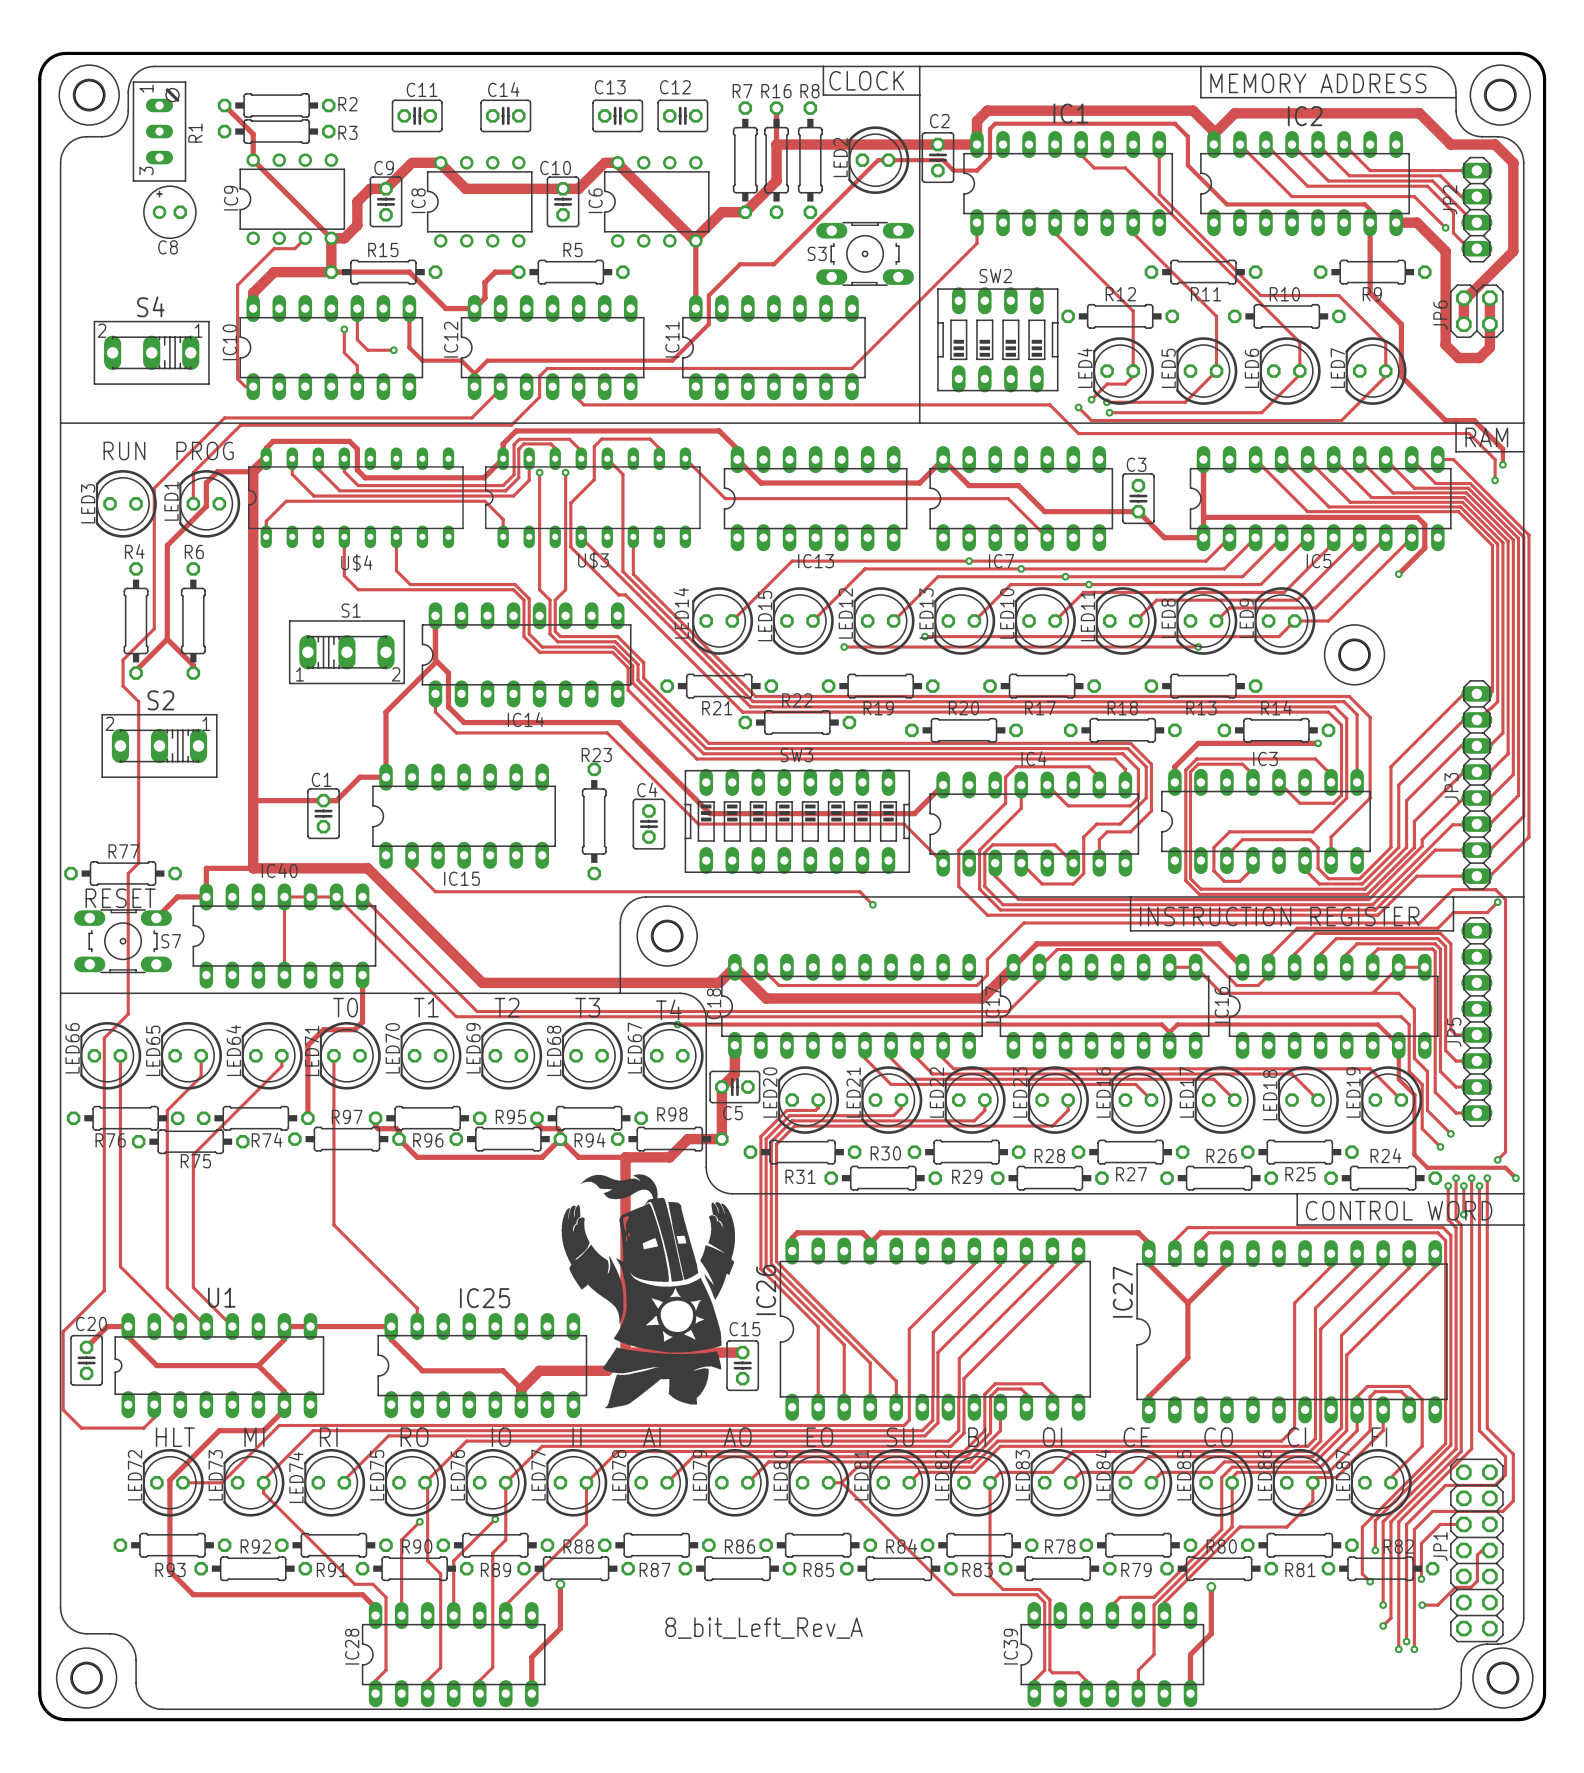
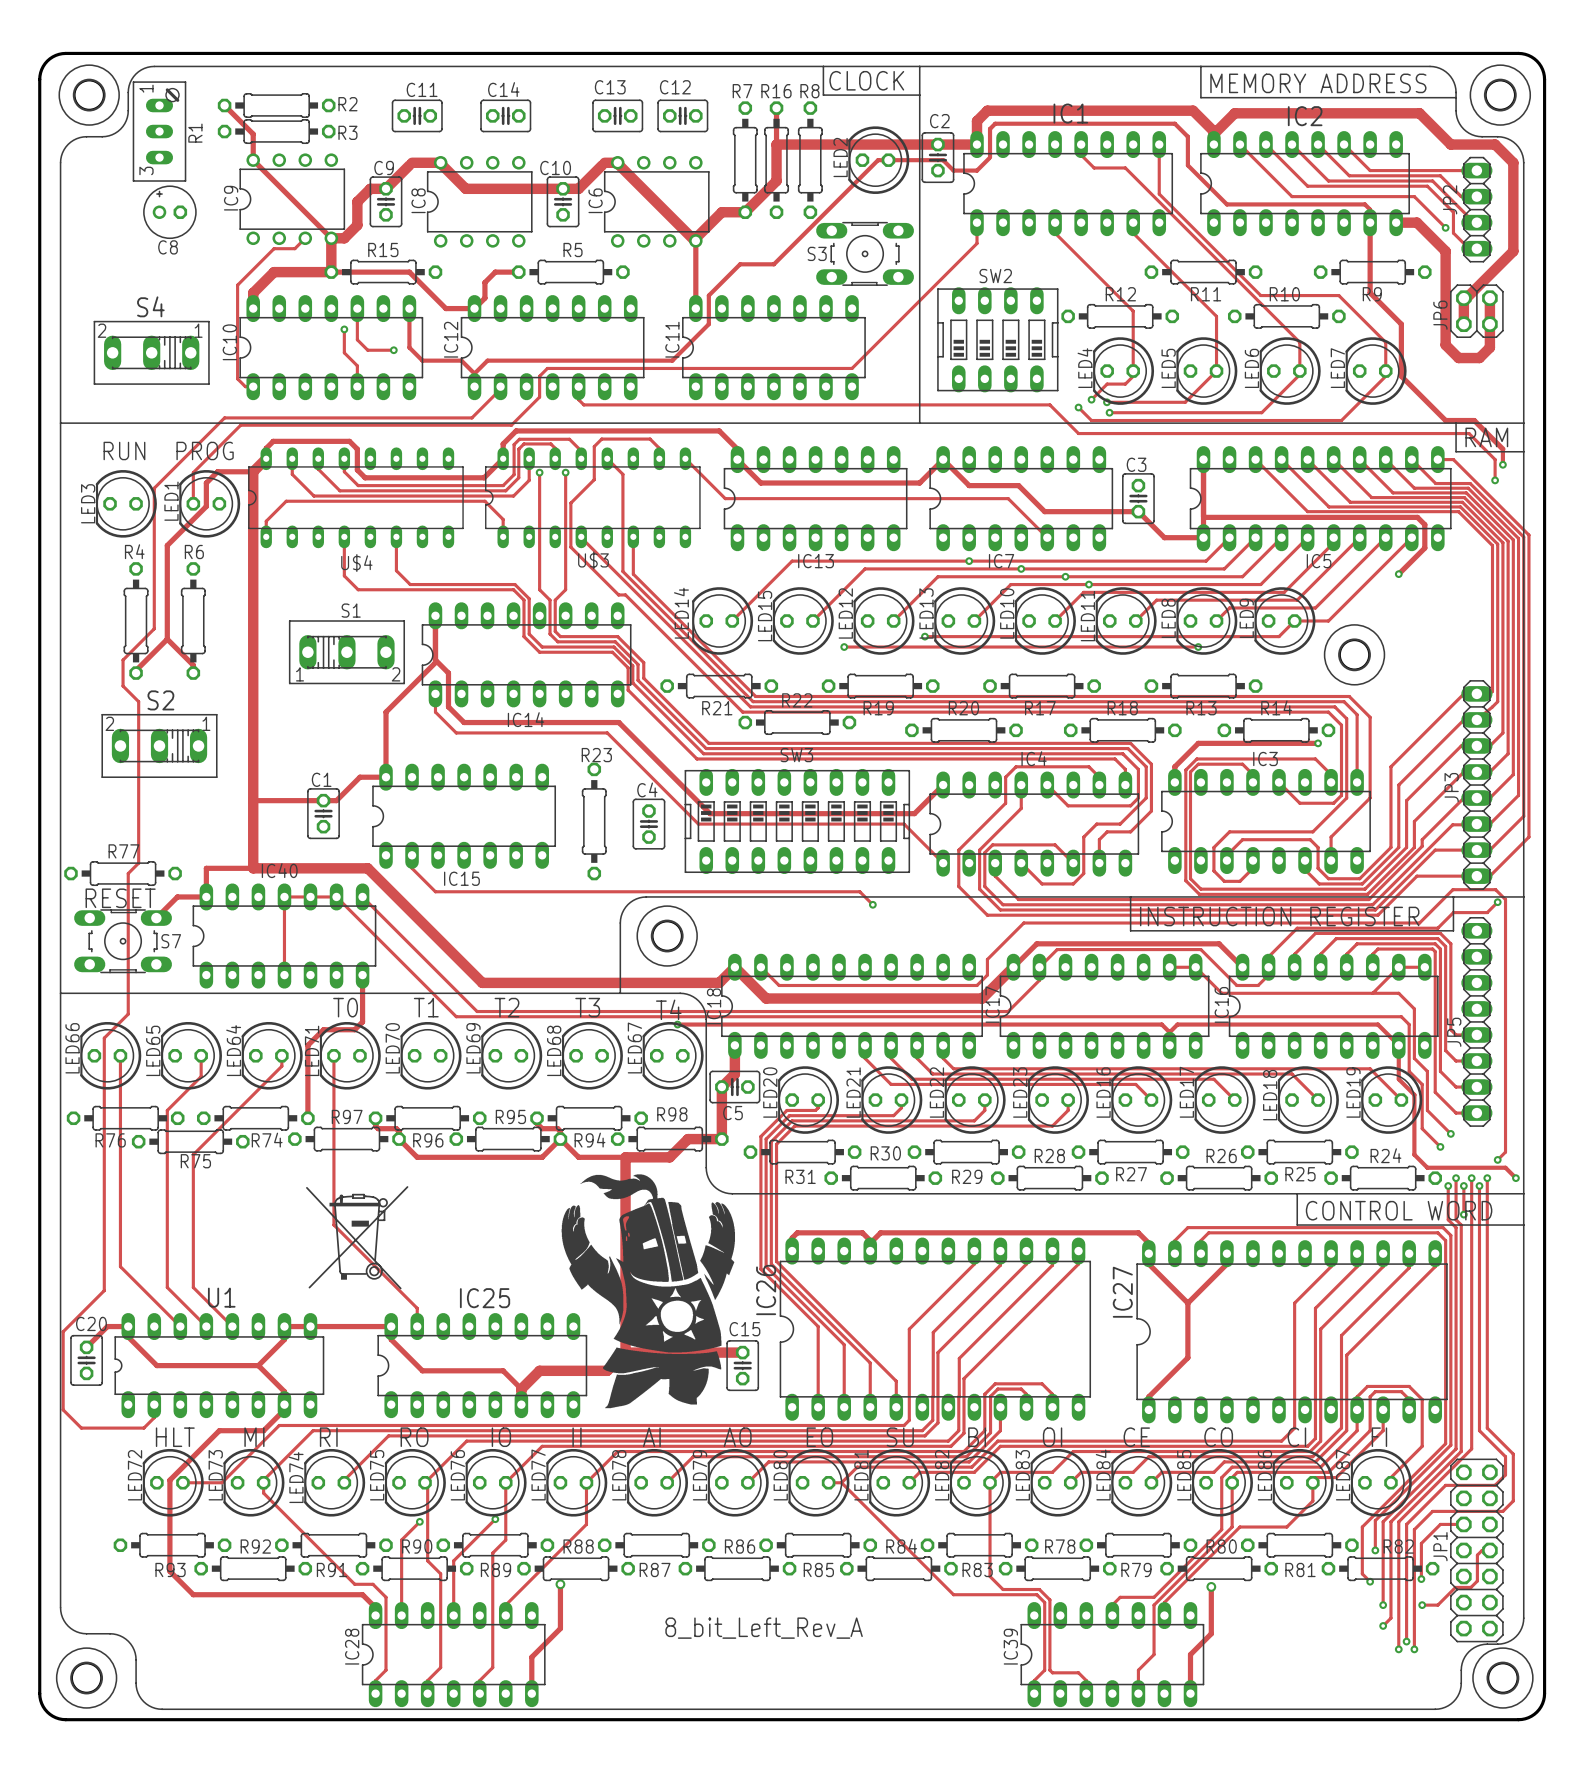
drawing: none -> [306, 1186, 409, 1290]

